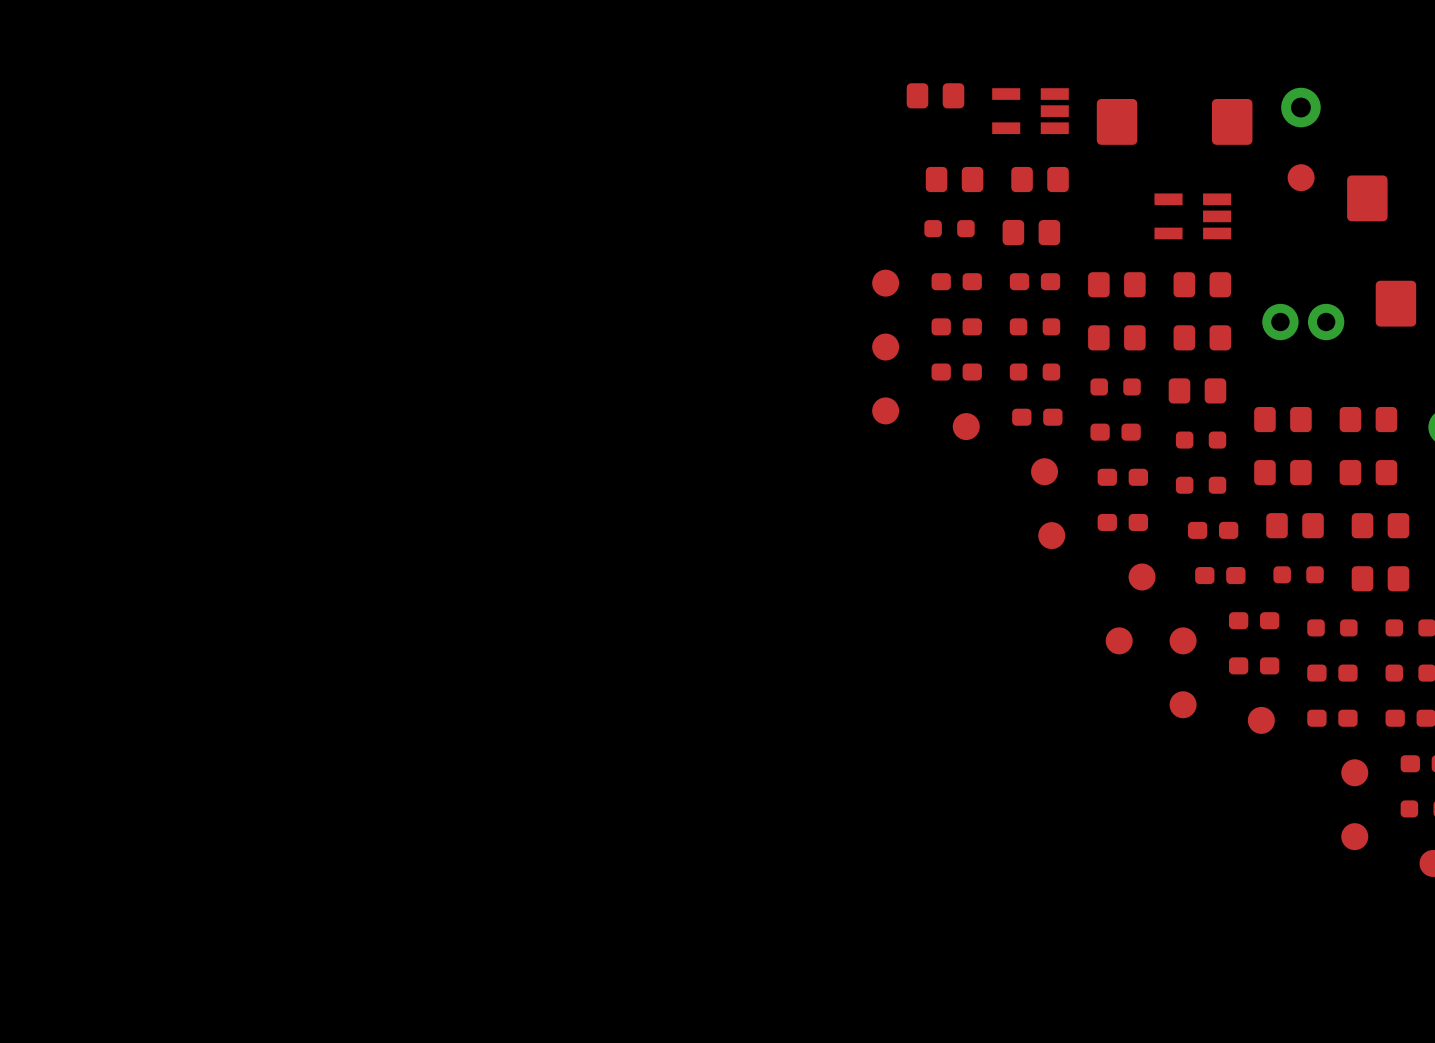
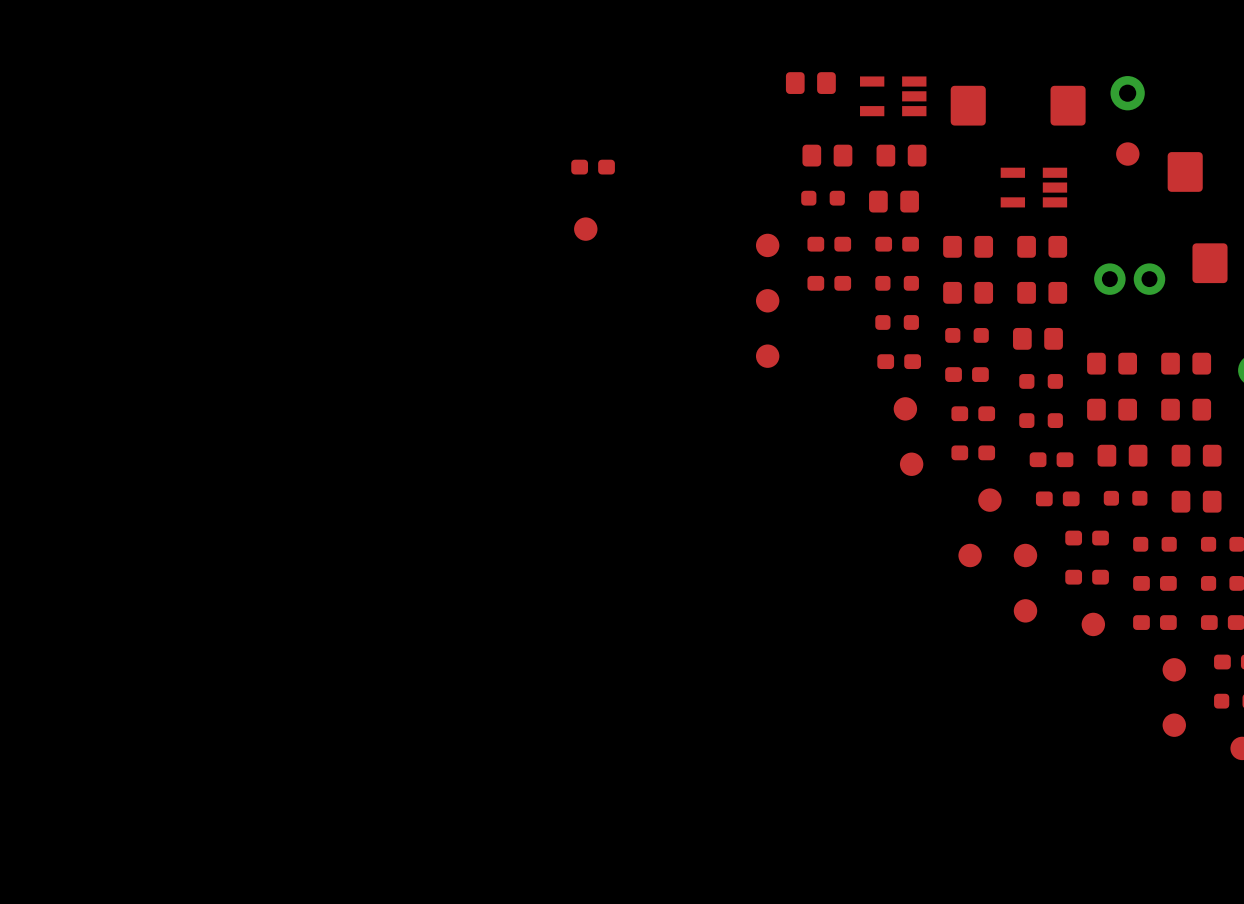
part position: (956, 372) -> (593, 167)
part position: (966, 426) -> (585, 229)

